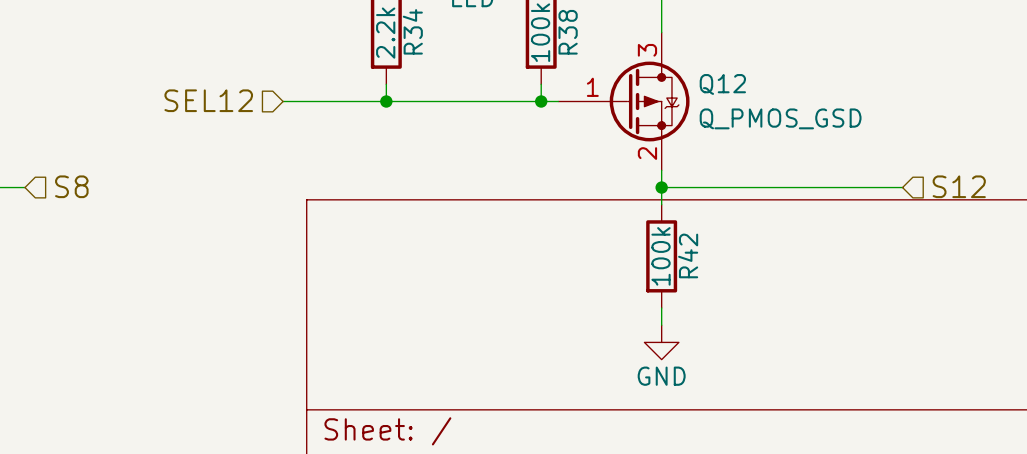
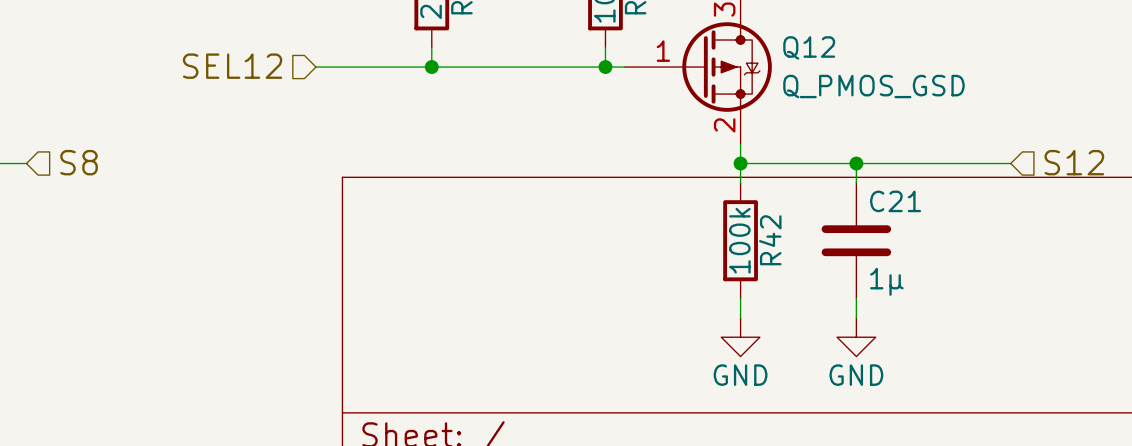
wire: none -> (856, 163) (856, 182)
junction: none -> (856, 163)
C21: none -> 1µ (856, 240)
wire: none -> (856, 298) (856, 317)
power symbol: none -> GND (856, 337)

